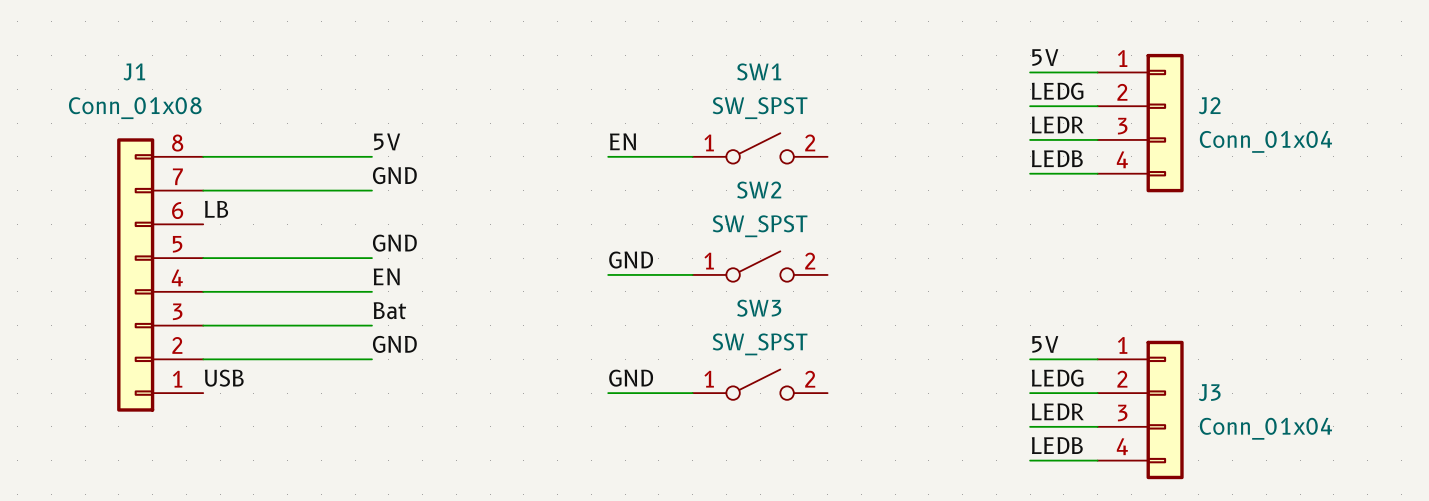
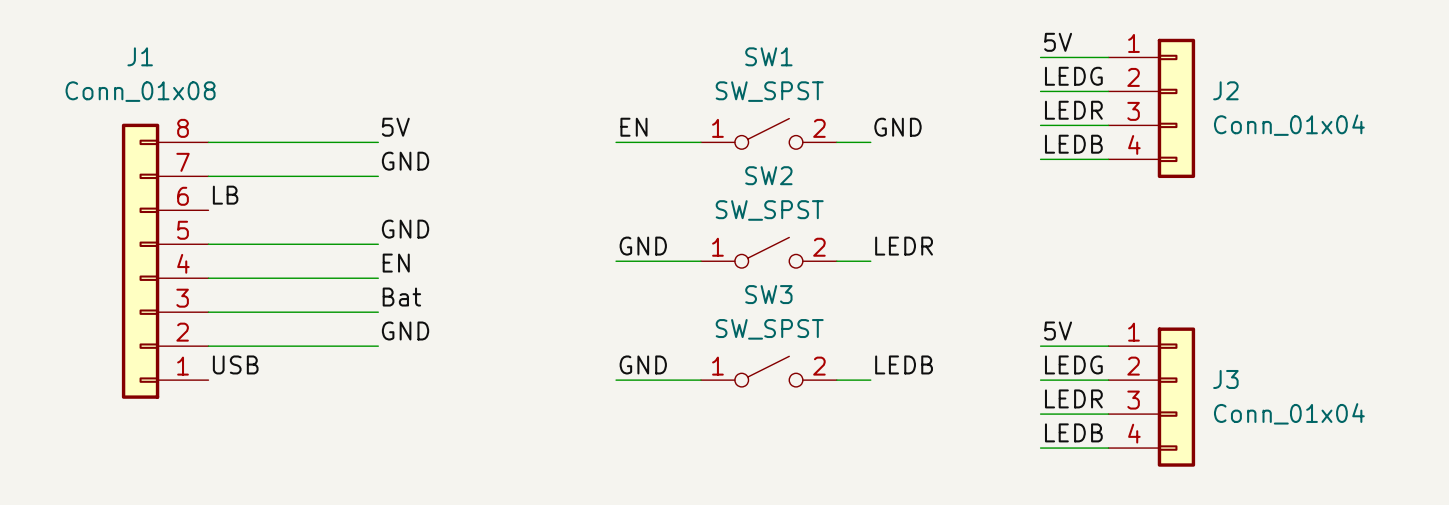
label: none -> GND (897, 127)
wire: none -> (836, 142) (870, 142)
label: none -> LEDR (904, 246)
wire: none -> (836, 261) (870, 261)
label: none -> LEDB (904, 364)
wire: none -> (836, 380) (870, 380)

